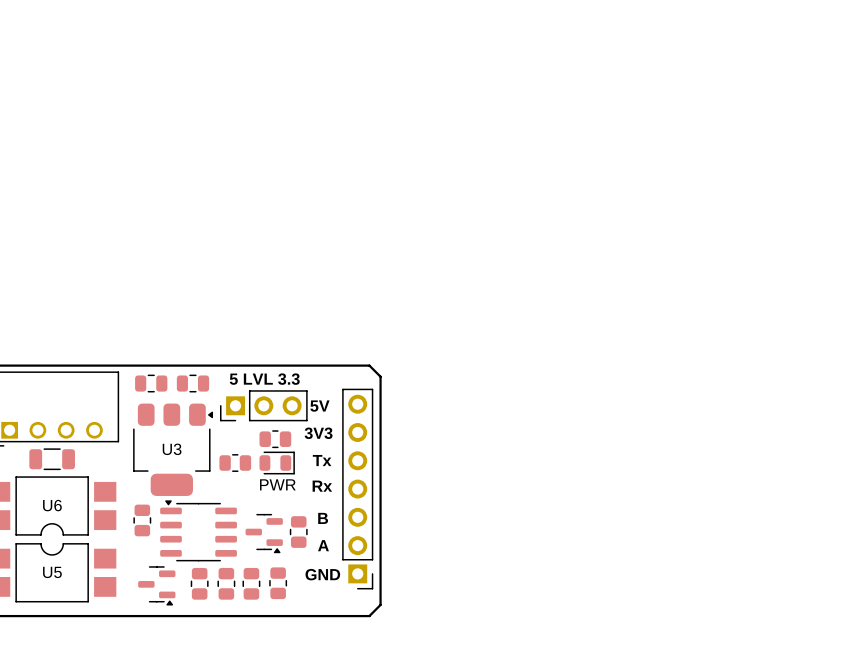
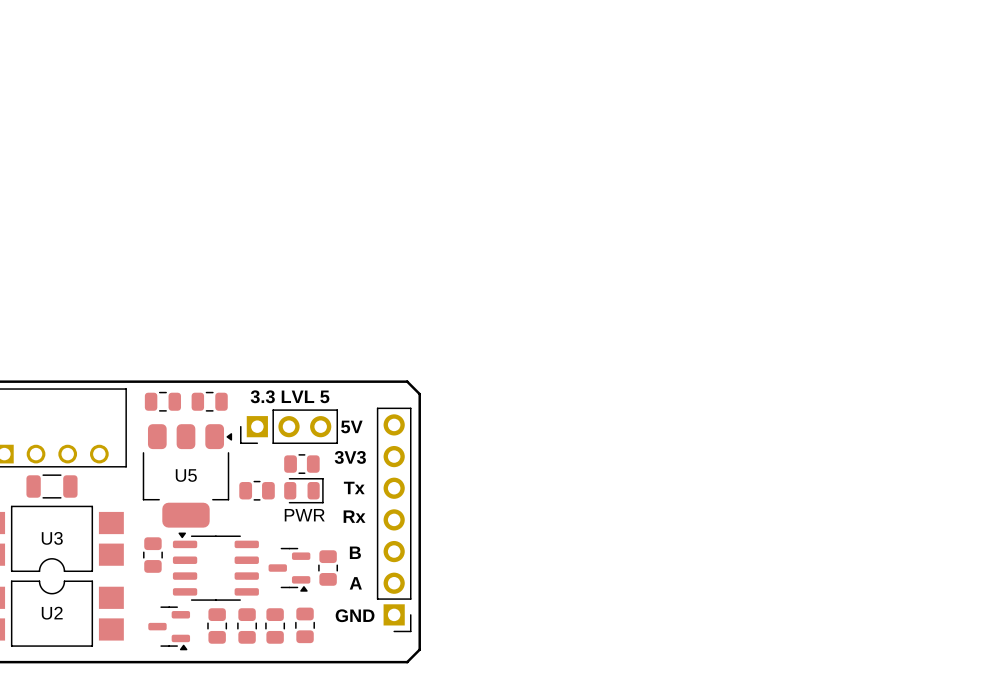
part value: 5 LVL 3.3 (264, 379) -> 3.3 LVL 5 (290, 396)
U3 name: U3 (172, 449) -> U5 (186, 475)
U6 name: U6 (52, 505) -> U3 (52, 538)
U5 name: U5 (52, 572) -> U2 (52, 613)

